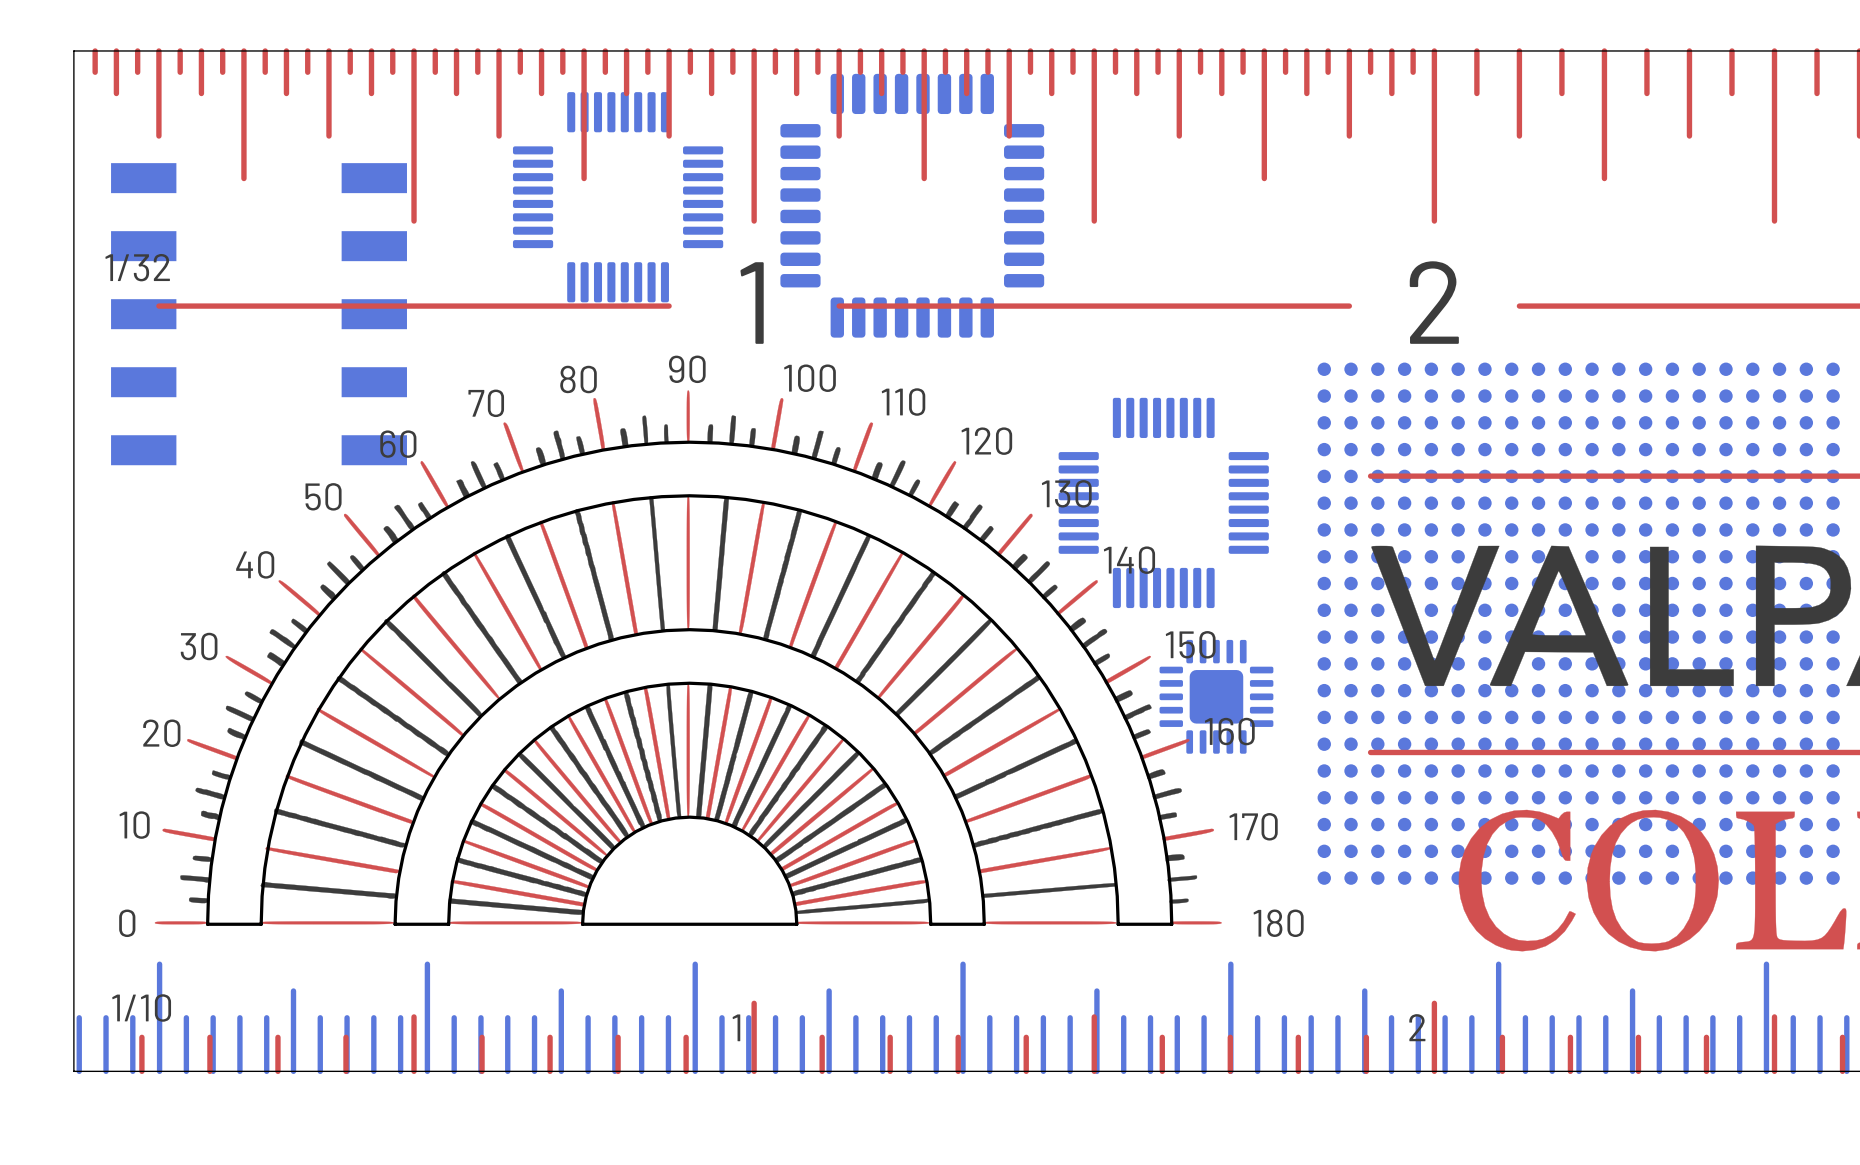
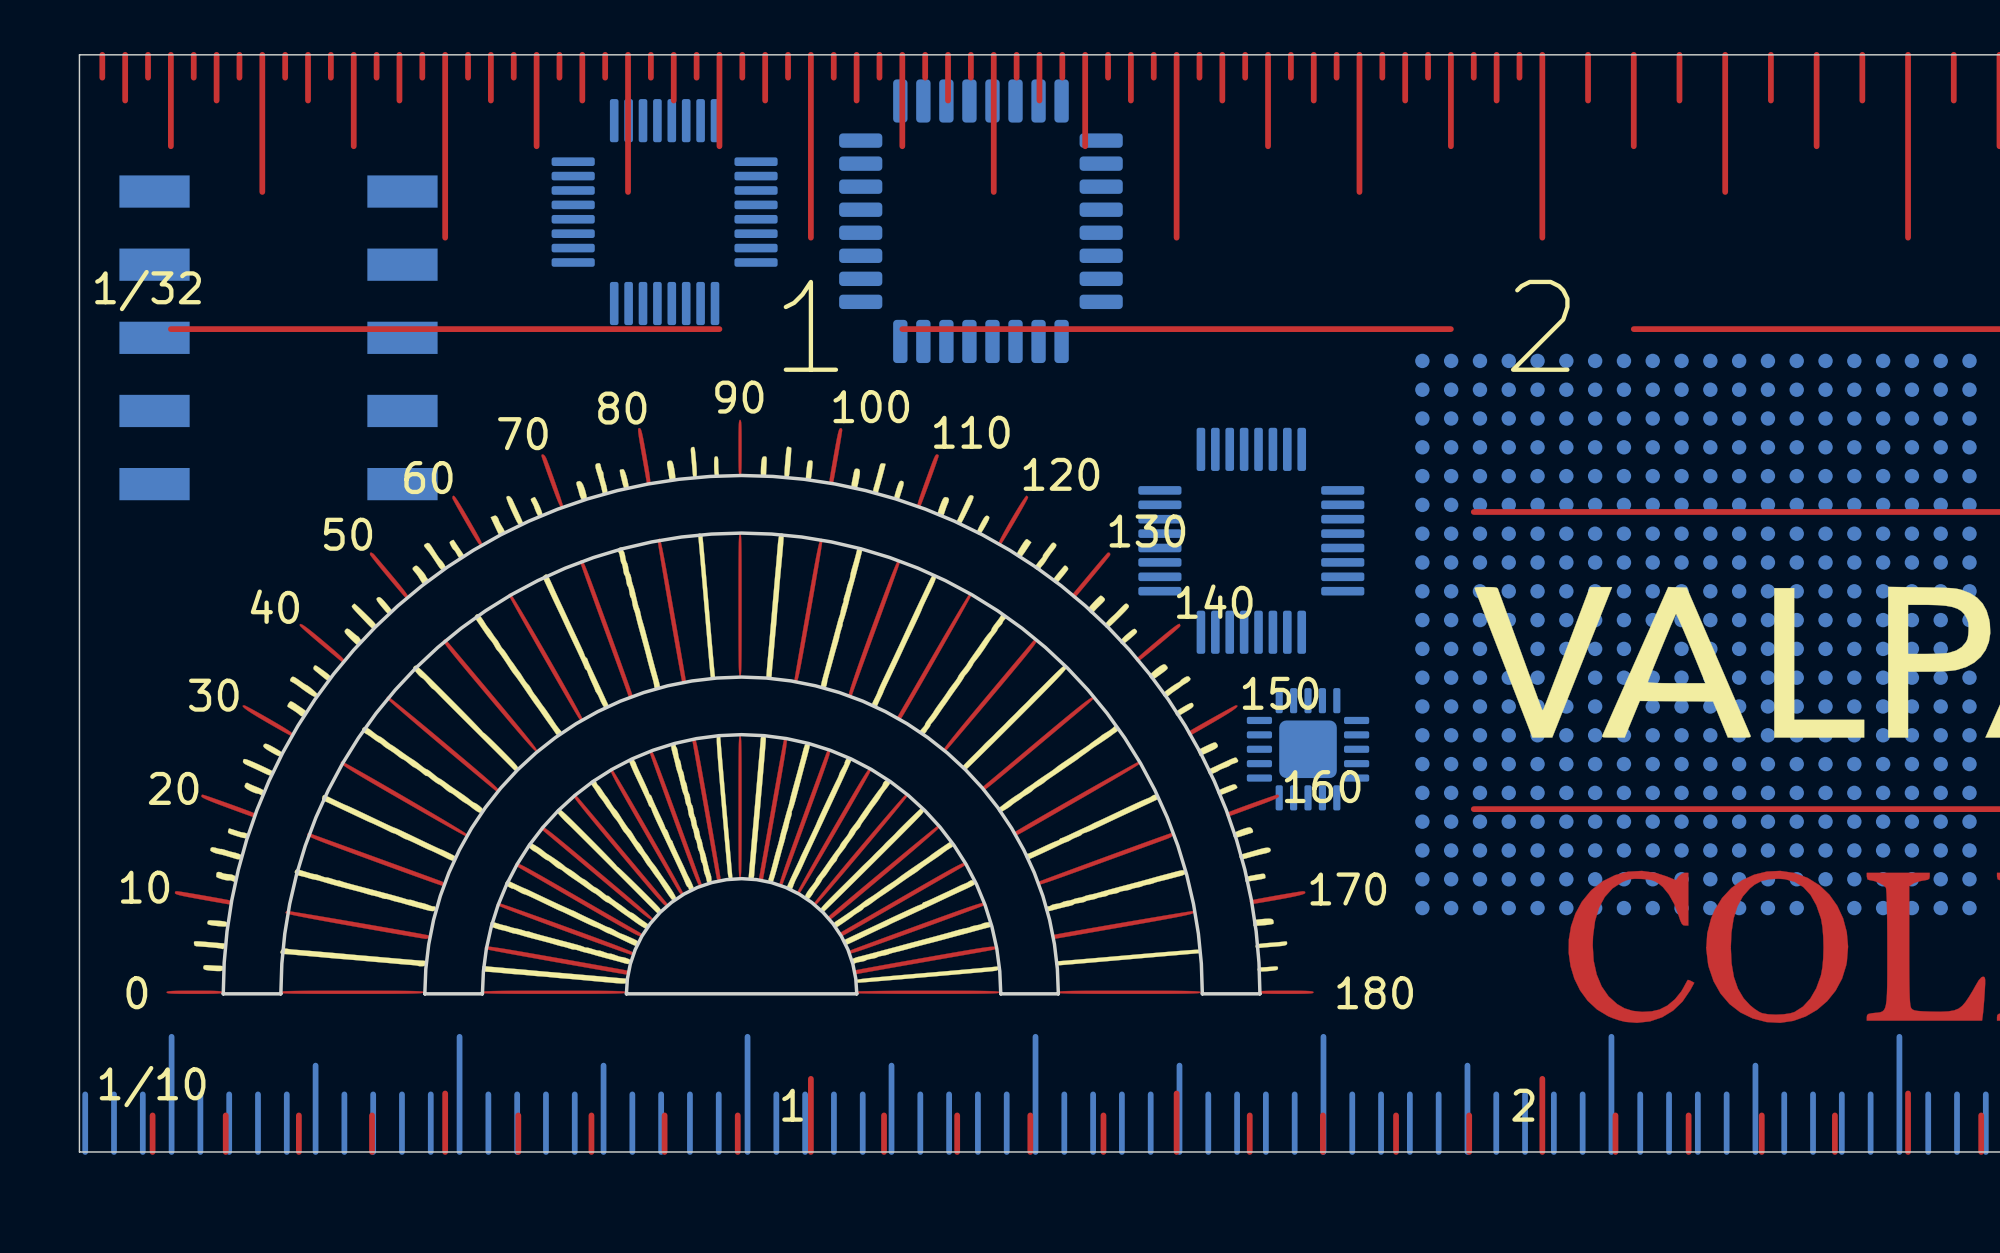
part position: (1578, 623) -> (1695, 634)

